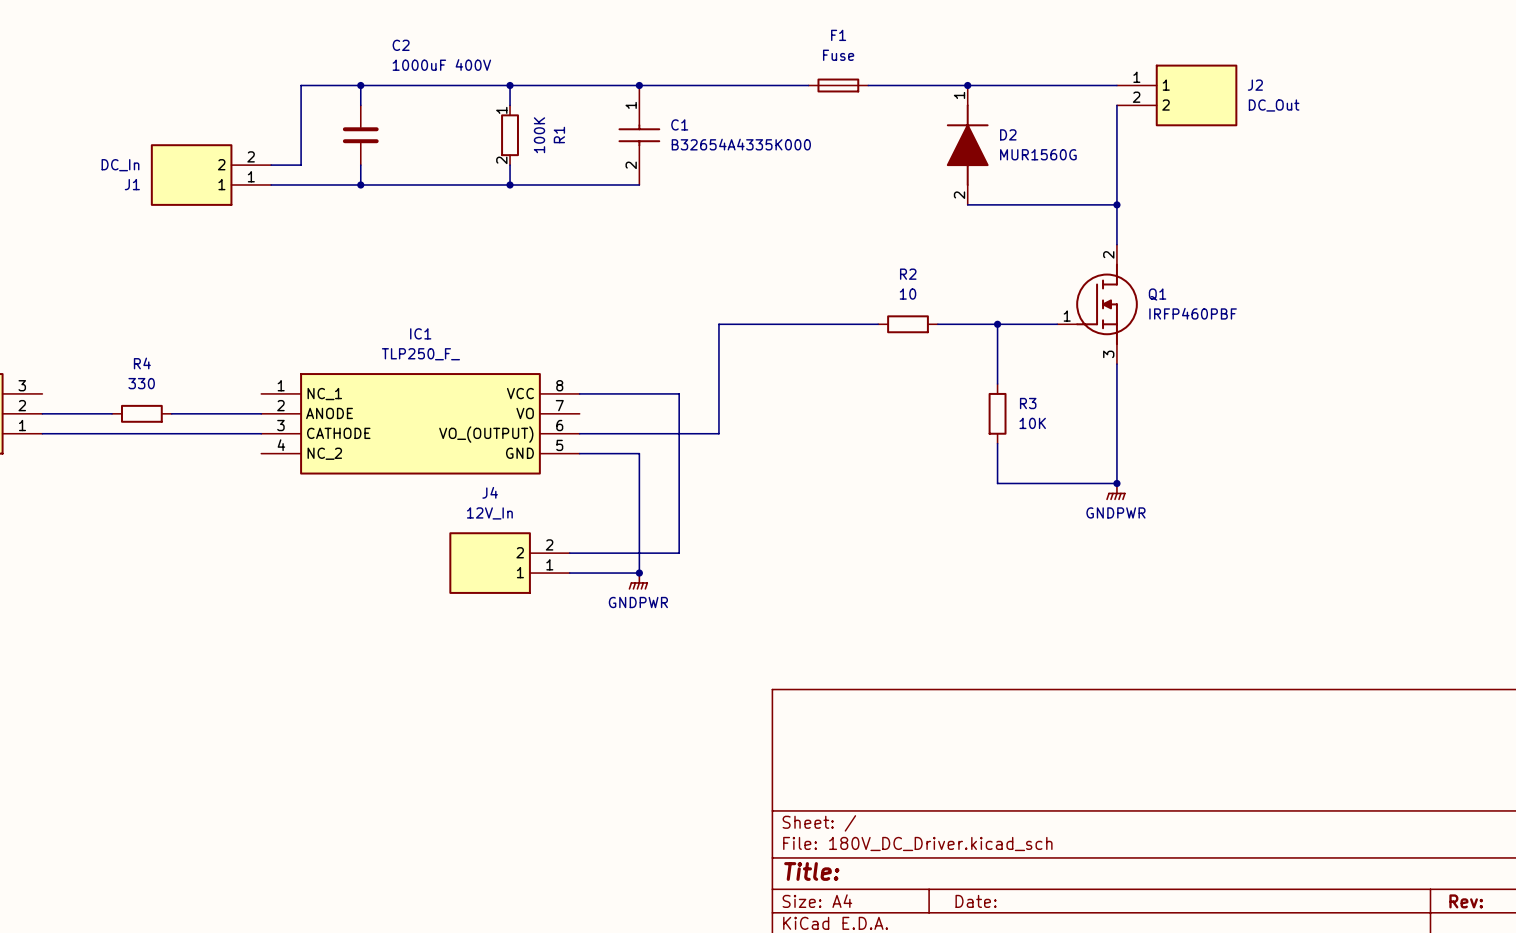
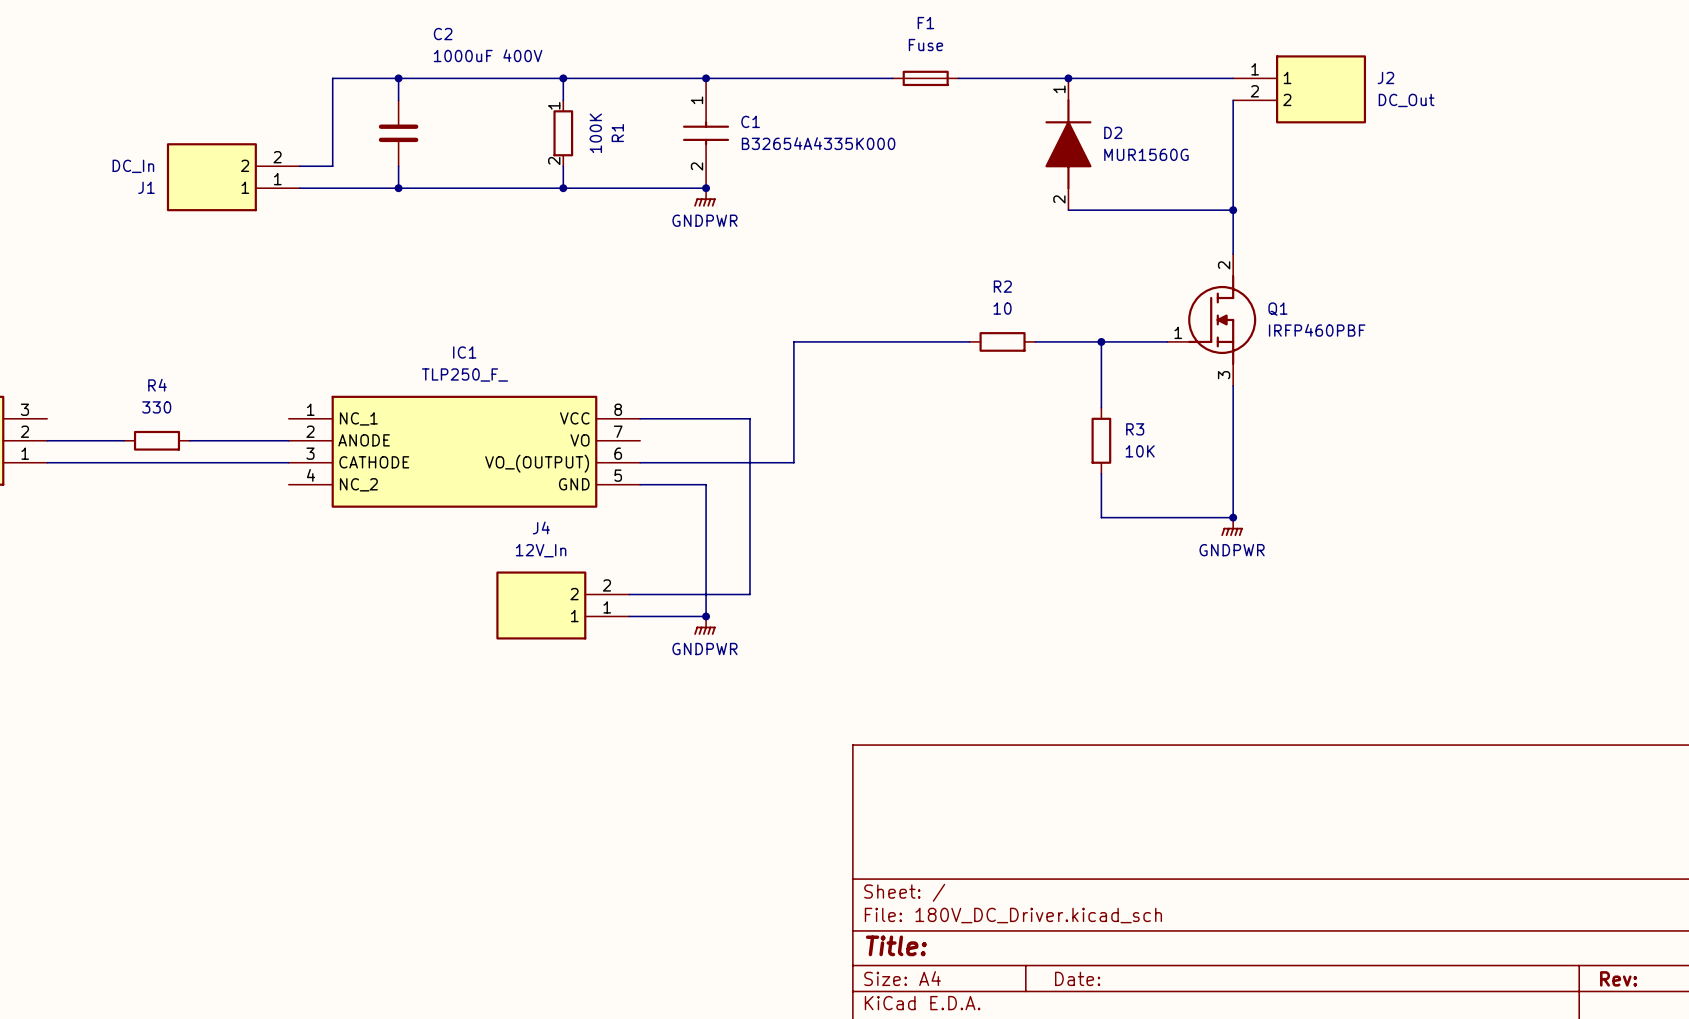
junction: none -> (706, 188)
power symbol: none -> GNDPWR (704, 197)

